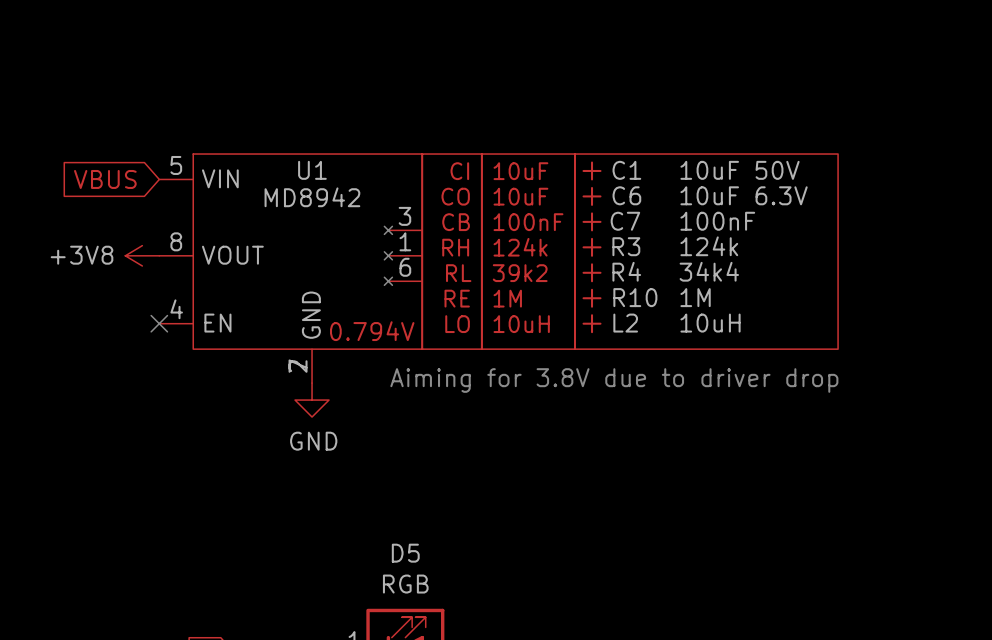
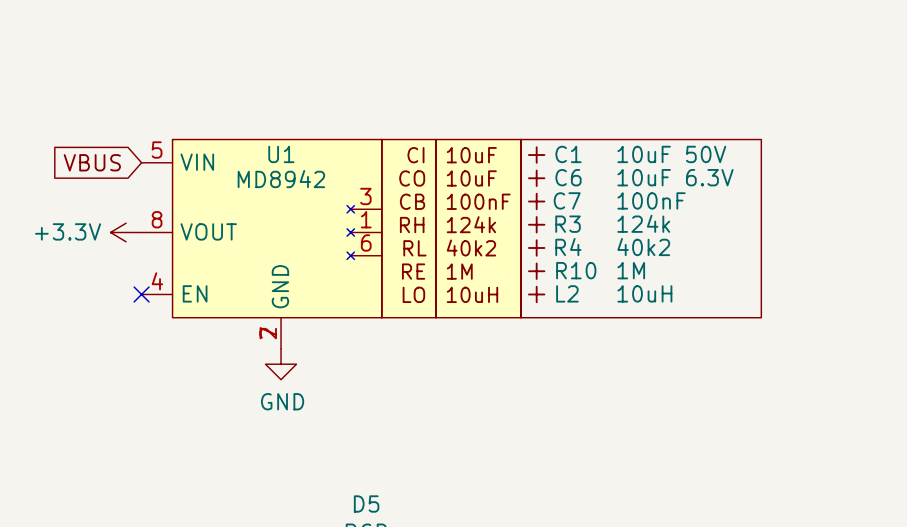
power symbol: +3V8 (142, 255) -> +3.3V (126, 232)
R4 value: 34k4 (709, 271) -> 40k2 (643, 247)
U1 text: 39k2 (520, 273) -> 40k2 (471, 247)
U1 text: 0.794V (372, 331) -> none
text: Aiming for 3.8V due to driver drop (614, 380) -> none

